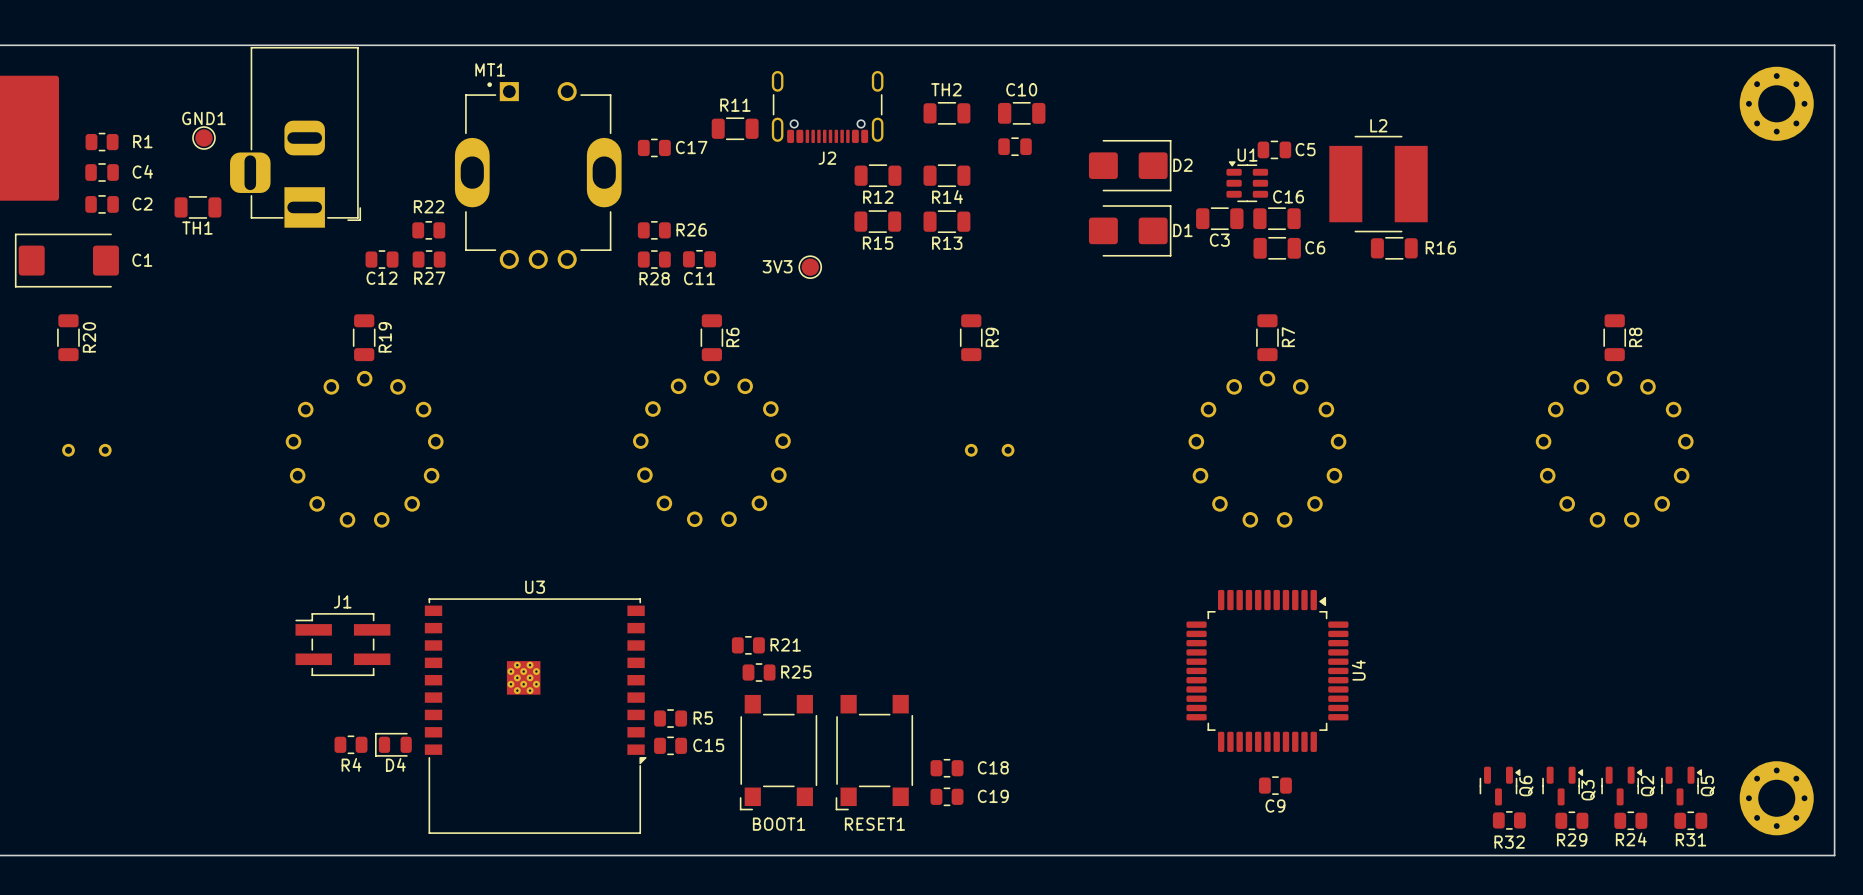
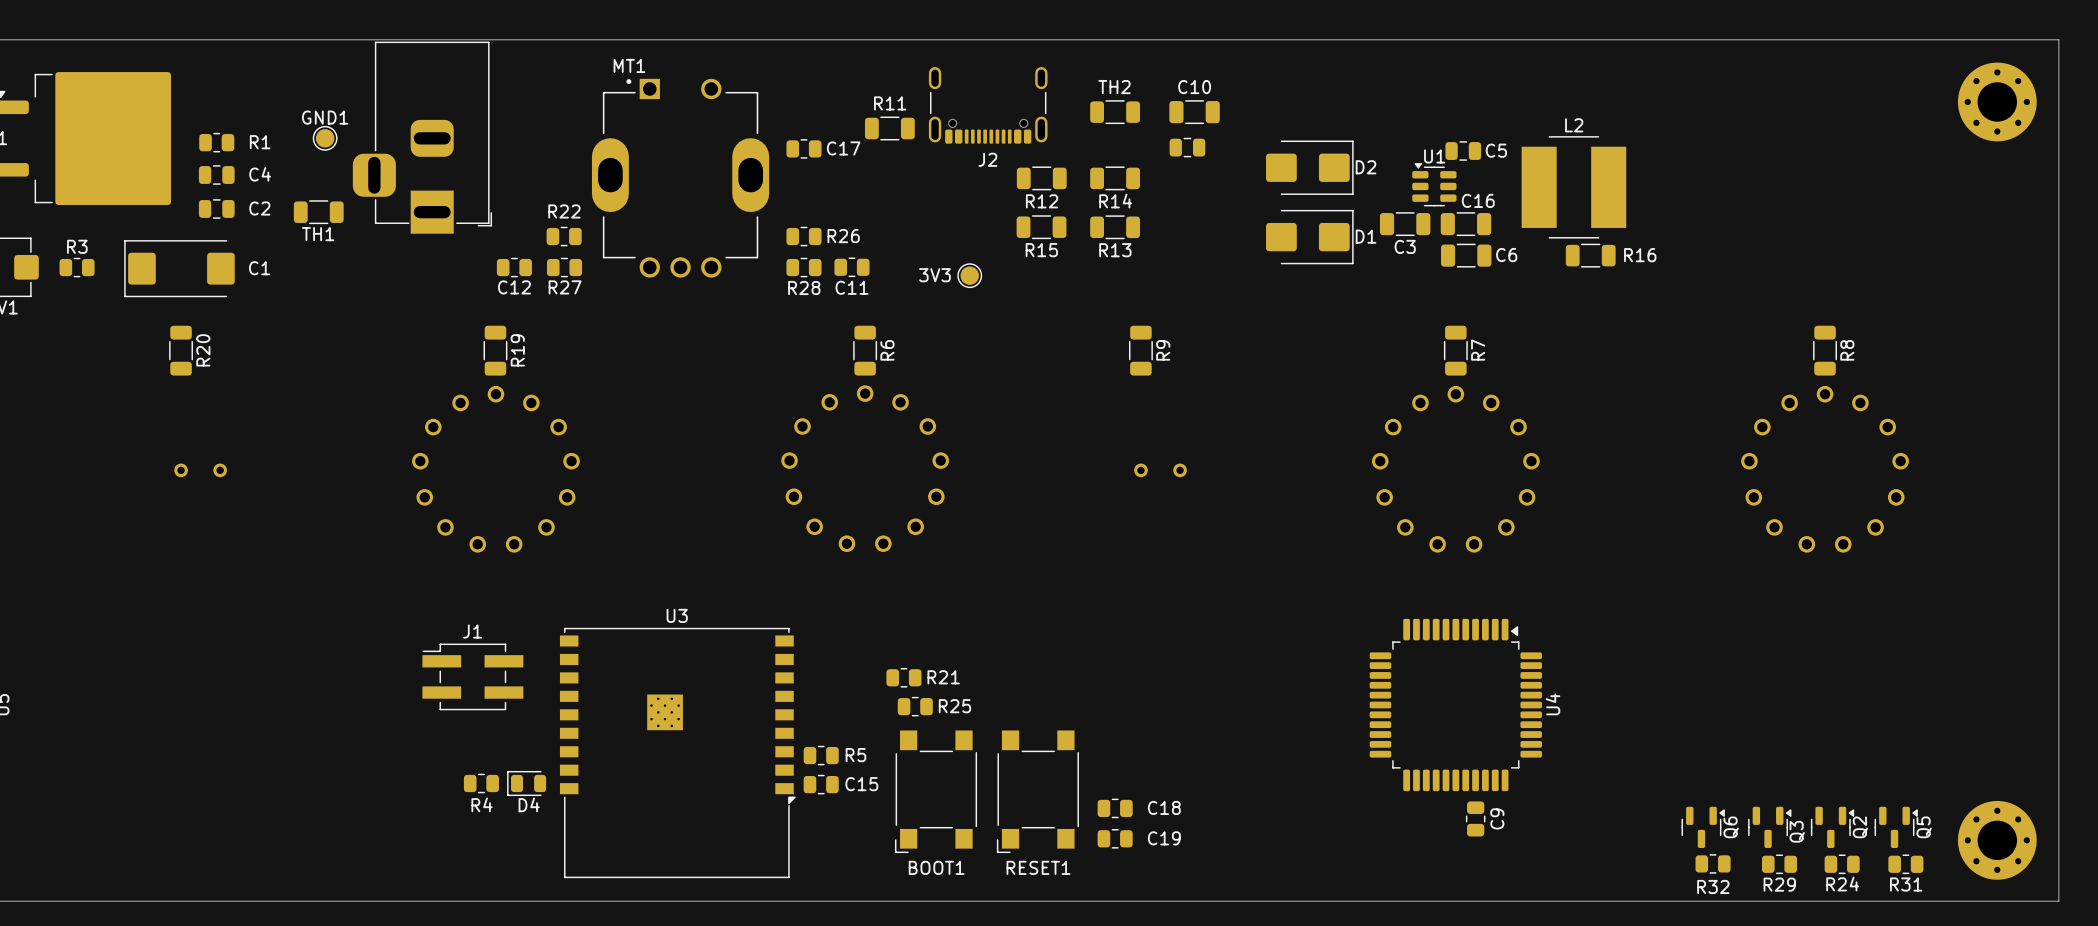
C9 rotation: 0° (1275, 785) -> 90° clockwise (1475, 818)
C9 name position: C9 (1275, 805) -> C9 (1497, 818)

